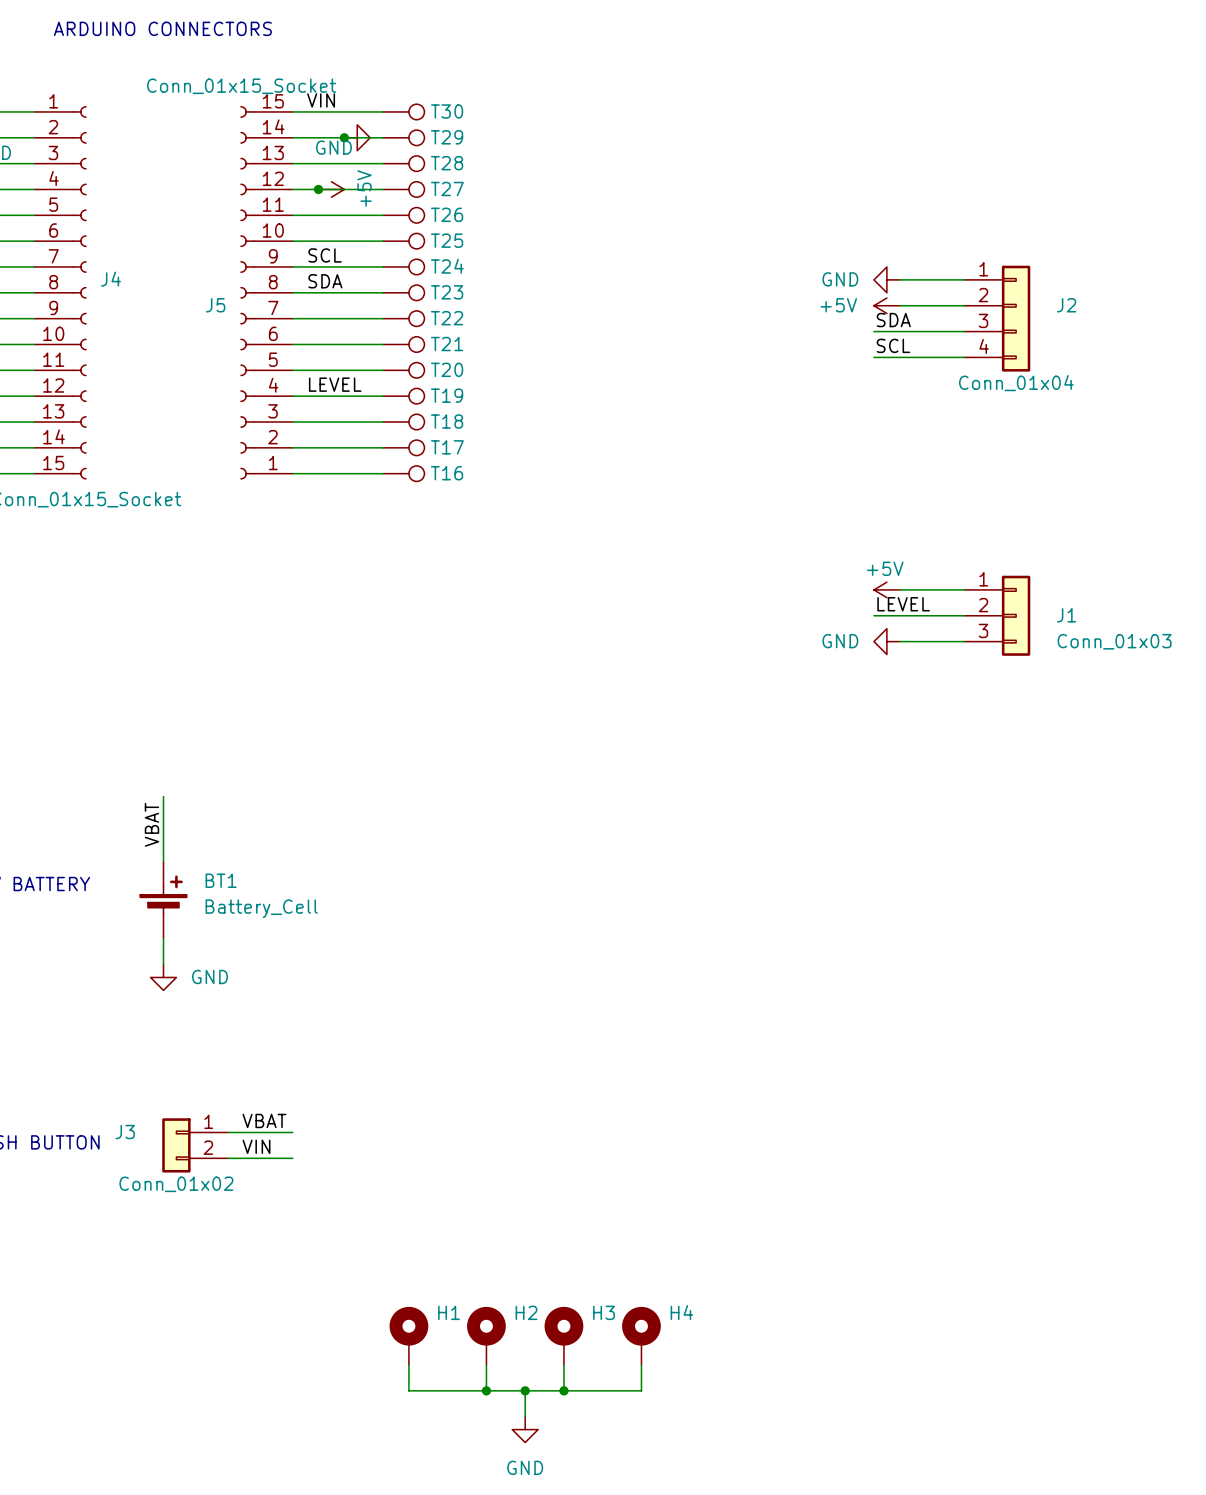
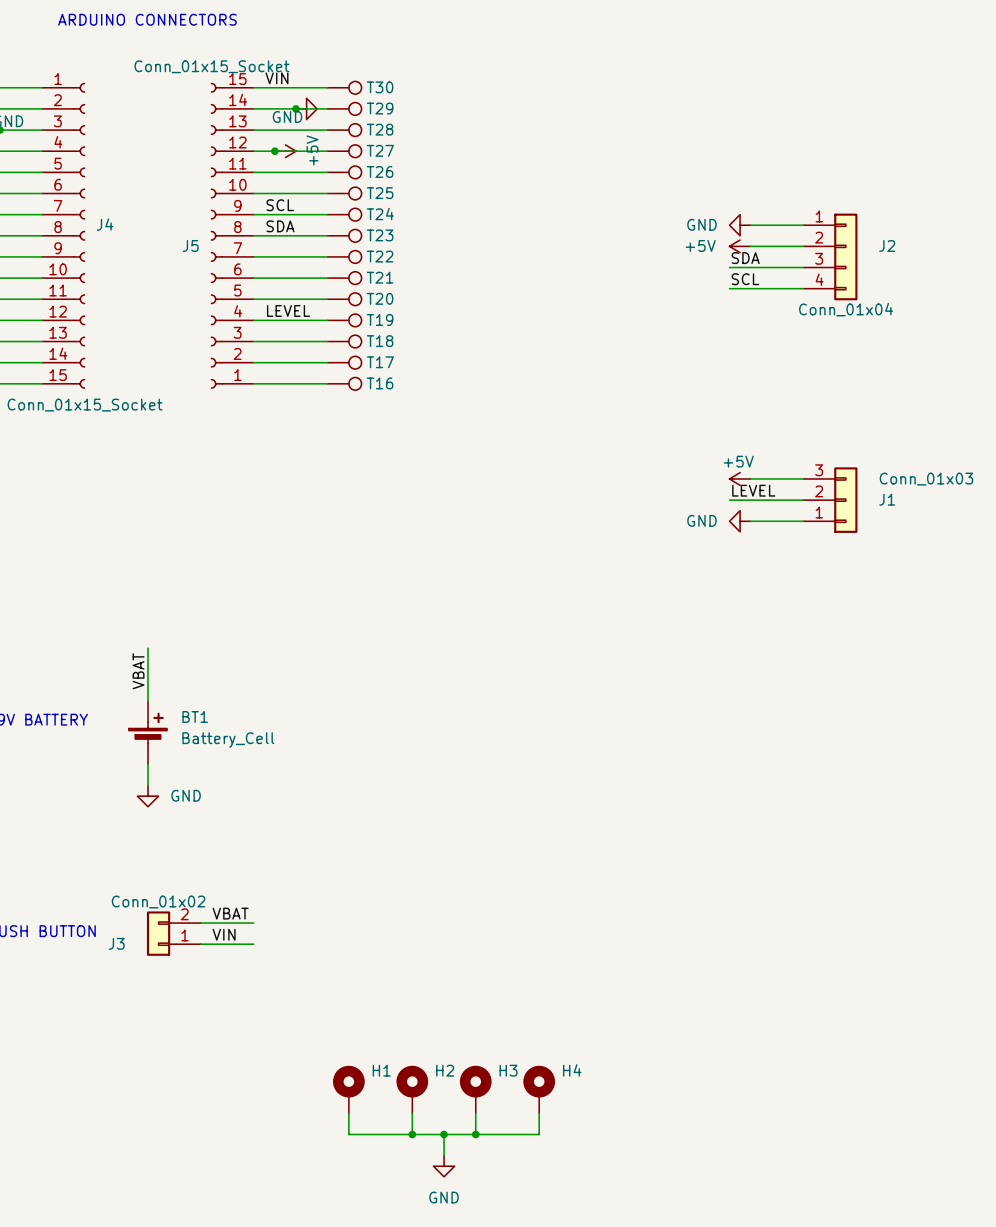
J1 flip: as is (1016, 615) -> up-down (845, 500)
J3 flip: as is (176, 1145) -> up-down (158, 933)

